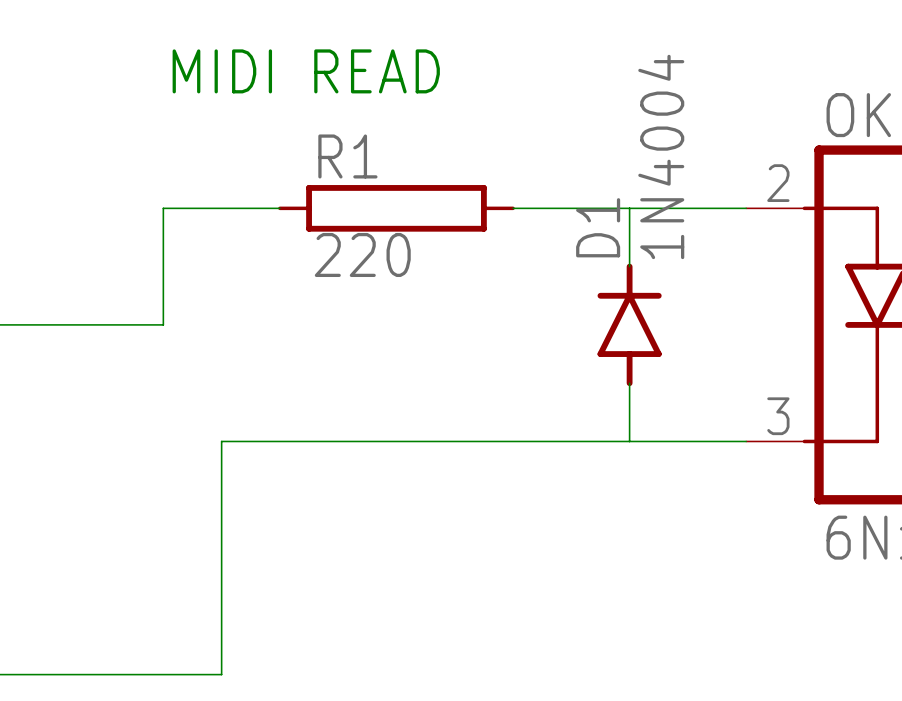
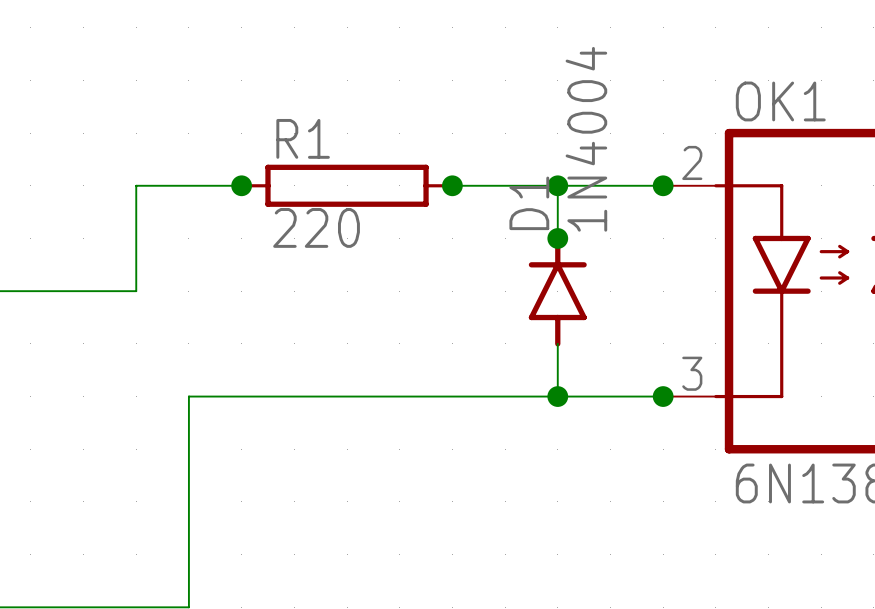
text: MIDI READ (306, 71) -> none
junction: none -> (241, 185)
junction: none -> (452, 185)
junction: none -> (557, 185)
junction: none -> (663, 185)
junction: none -> (557, 238)
junction: none -> (557, 396)
junction: none -> (663, 396)

